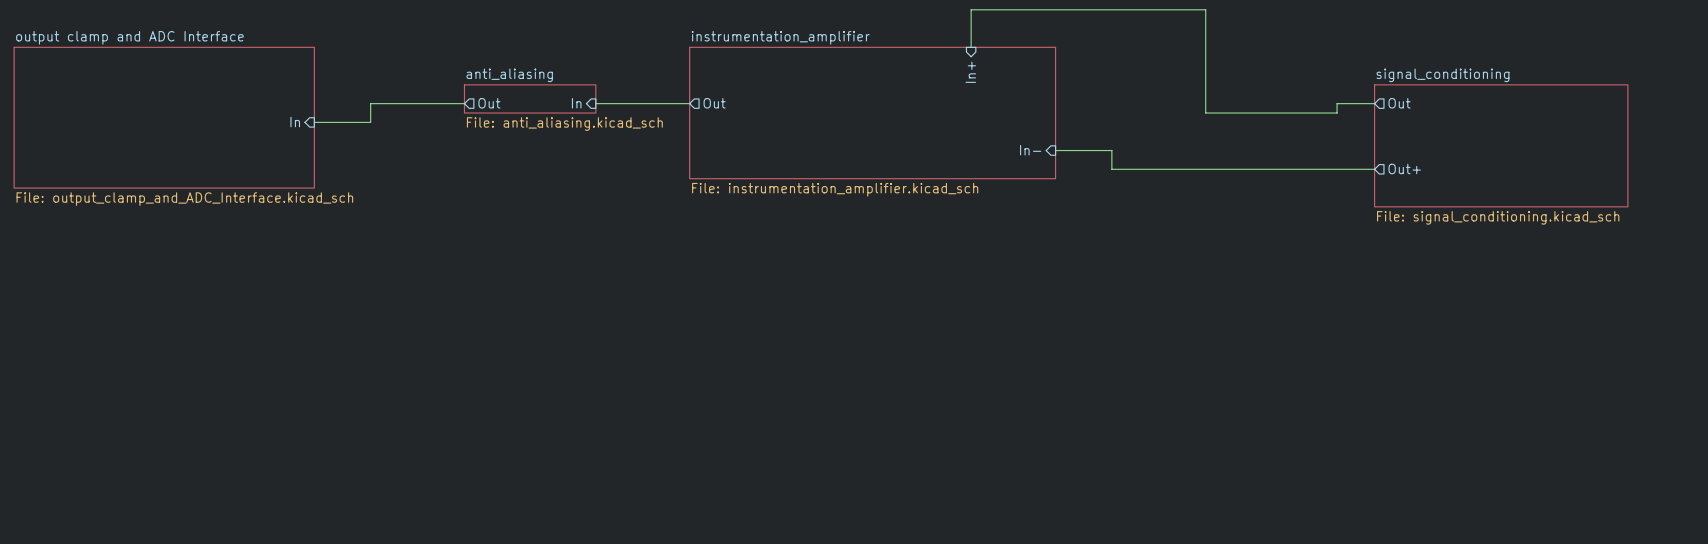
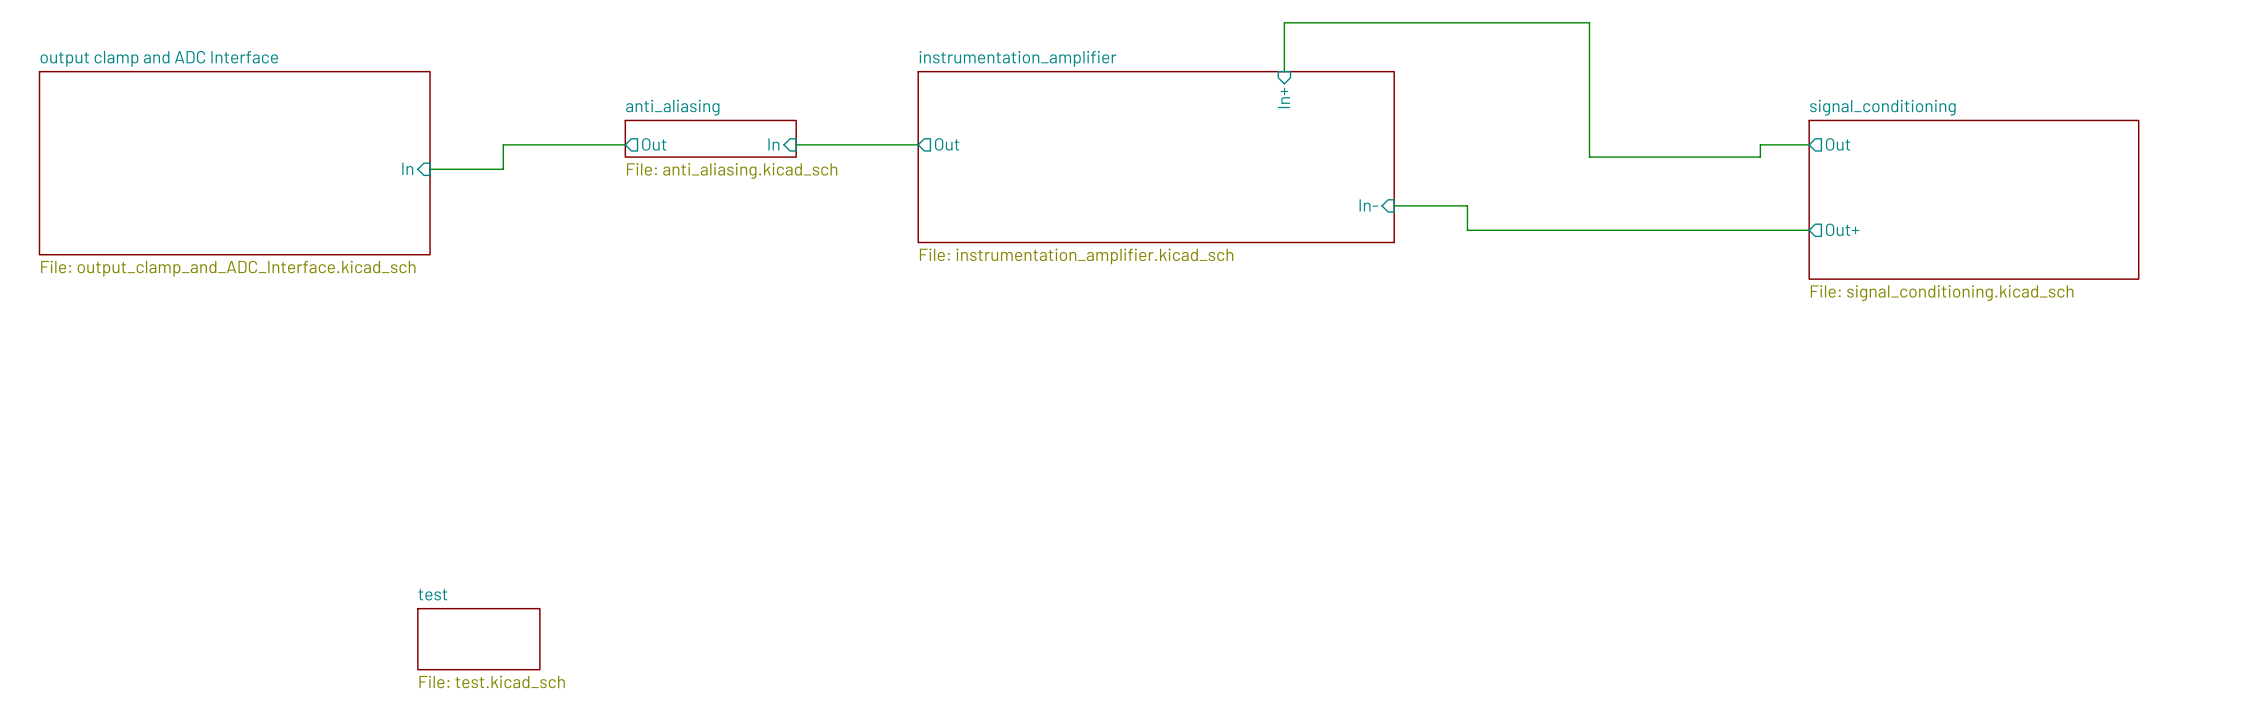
sheet test: none -> File: test.kicad_sch (478, 639)

